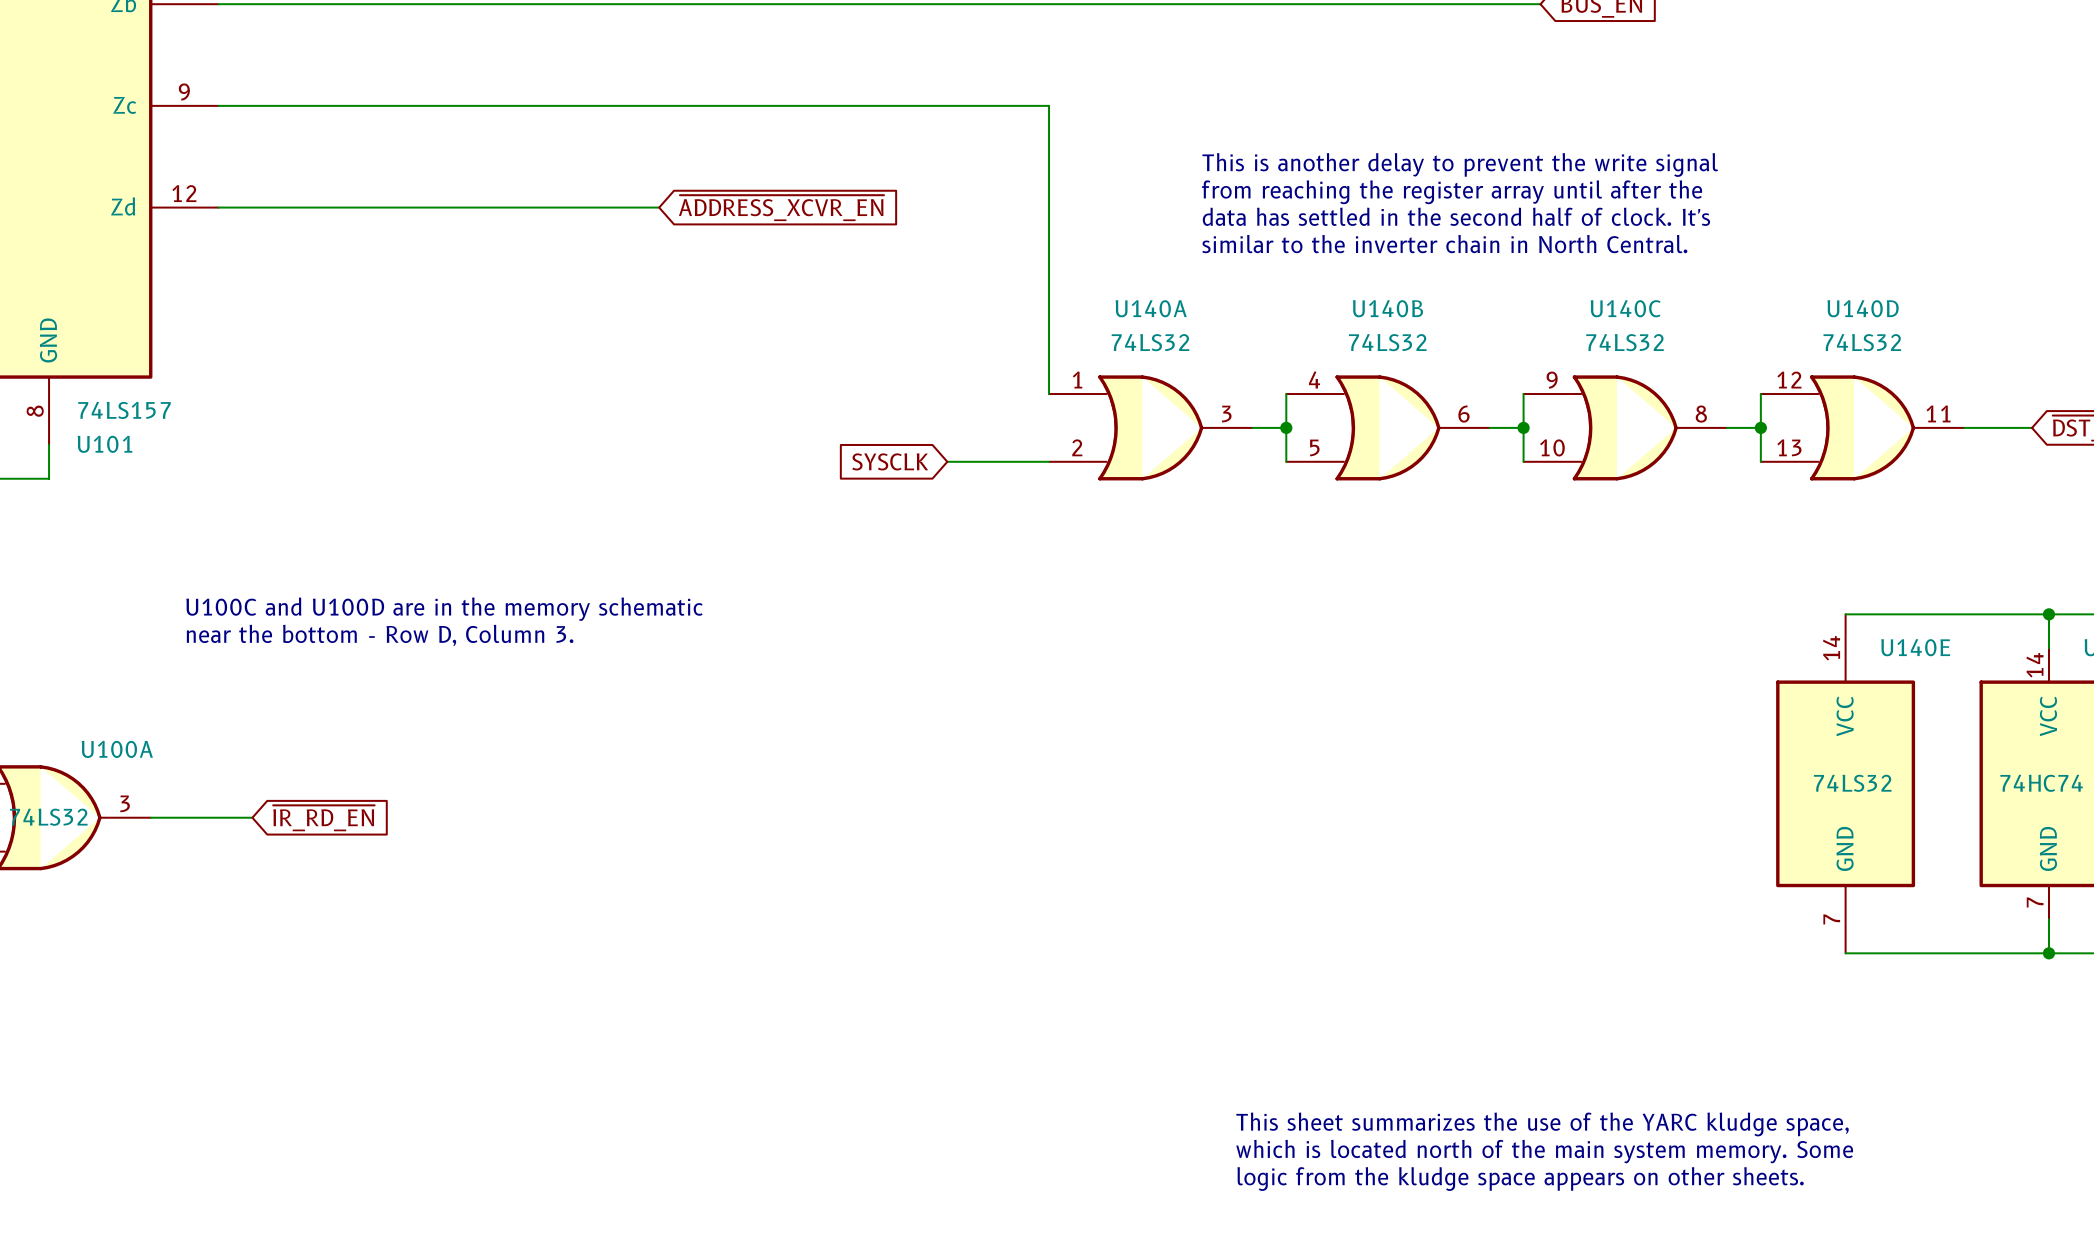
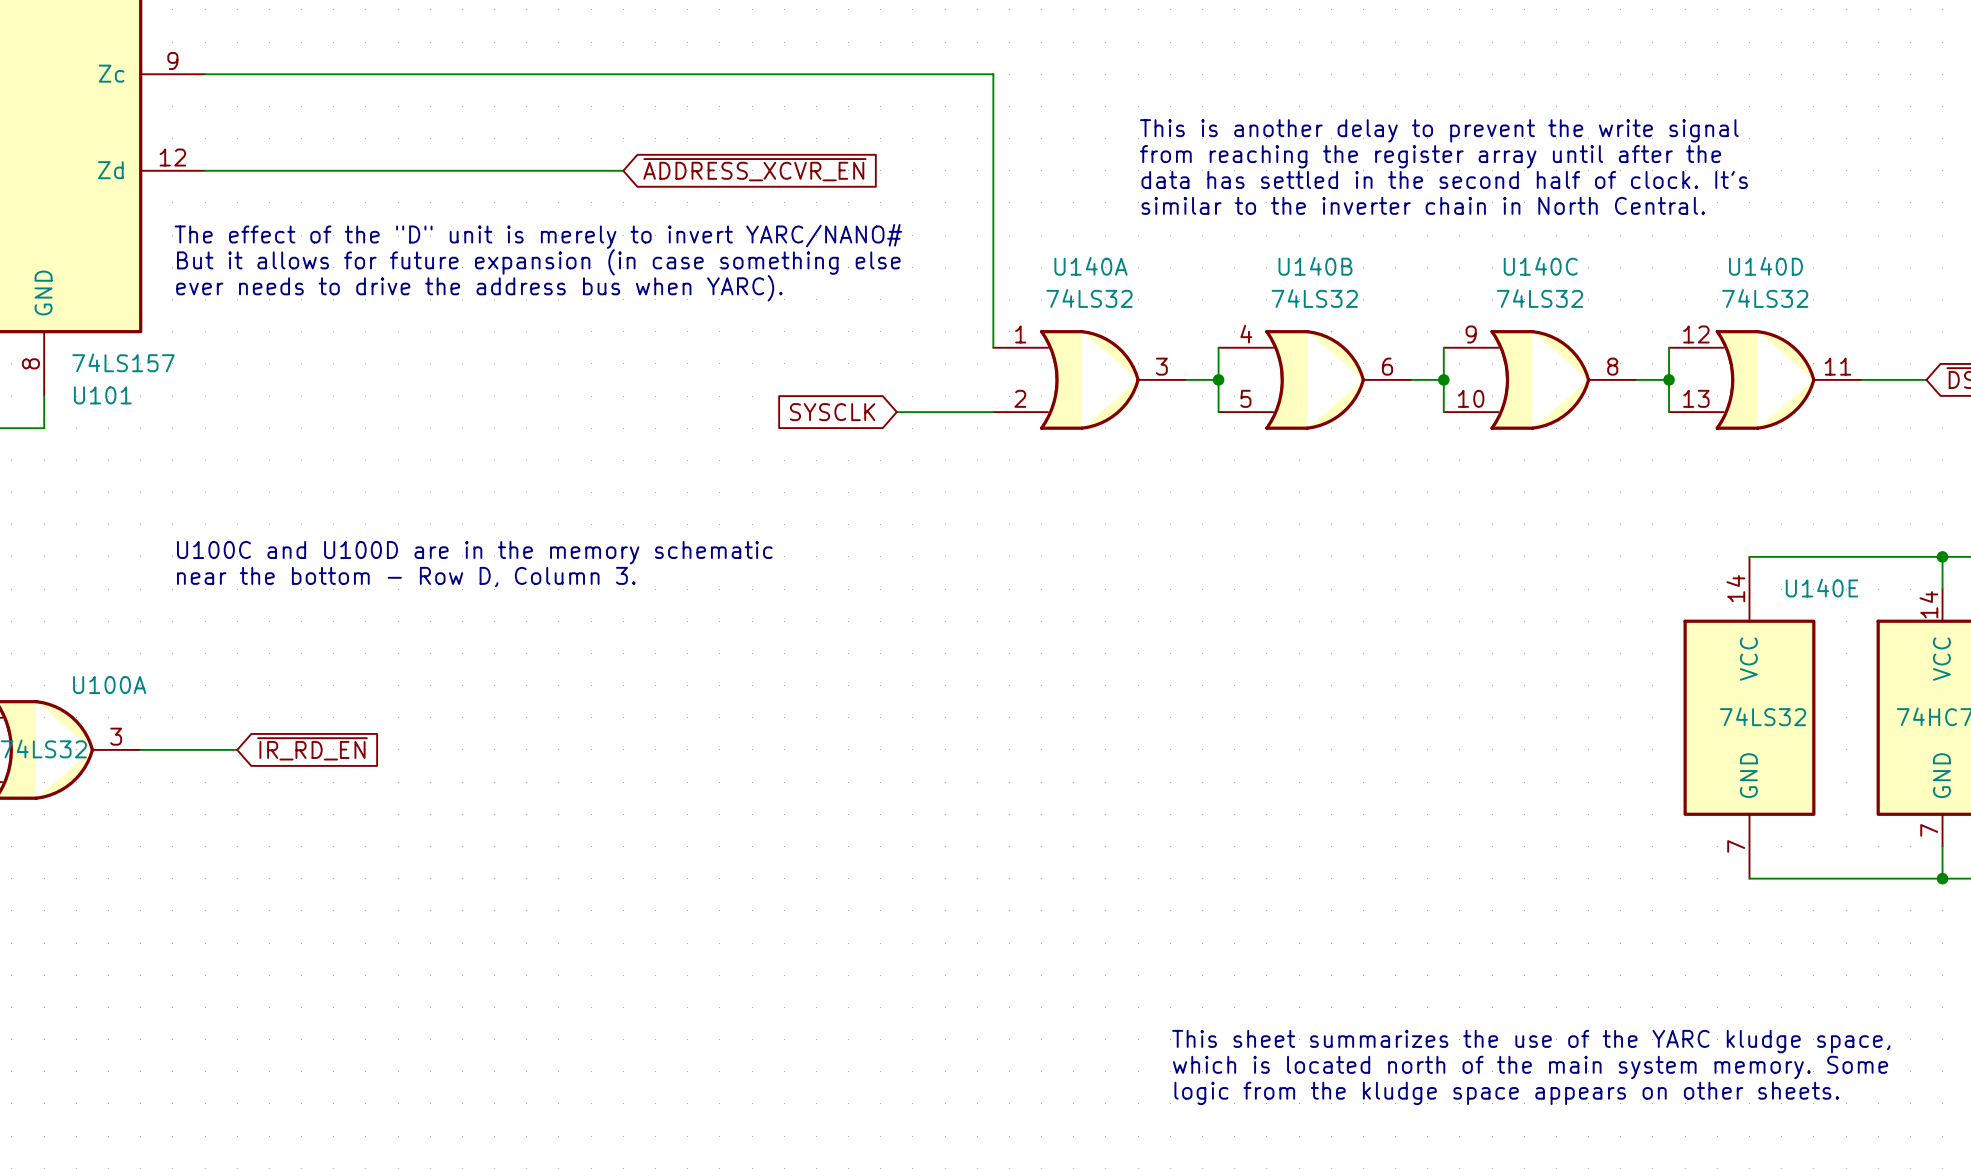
text: none -> The effect of the "D" unit is merely to invert YARC/NANO# (538, 236)
text: none -> But it allows for future expansion (in case something else (538, 262)
text: none -> ever needs to drive the address bus when YARC). (479, 288)

